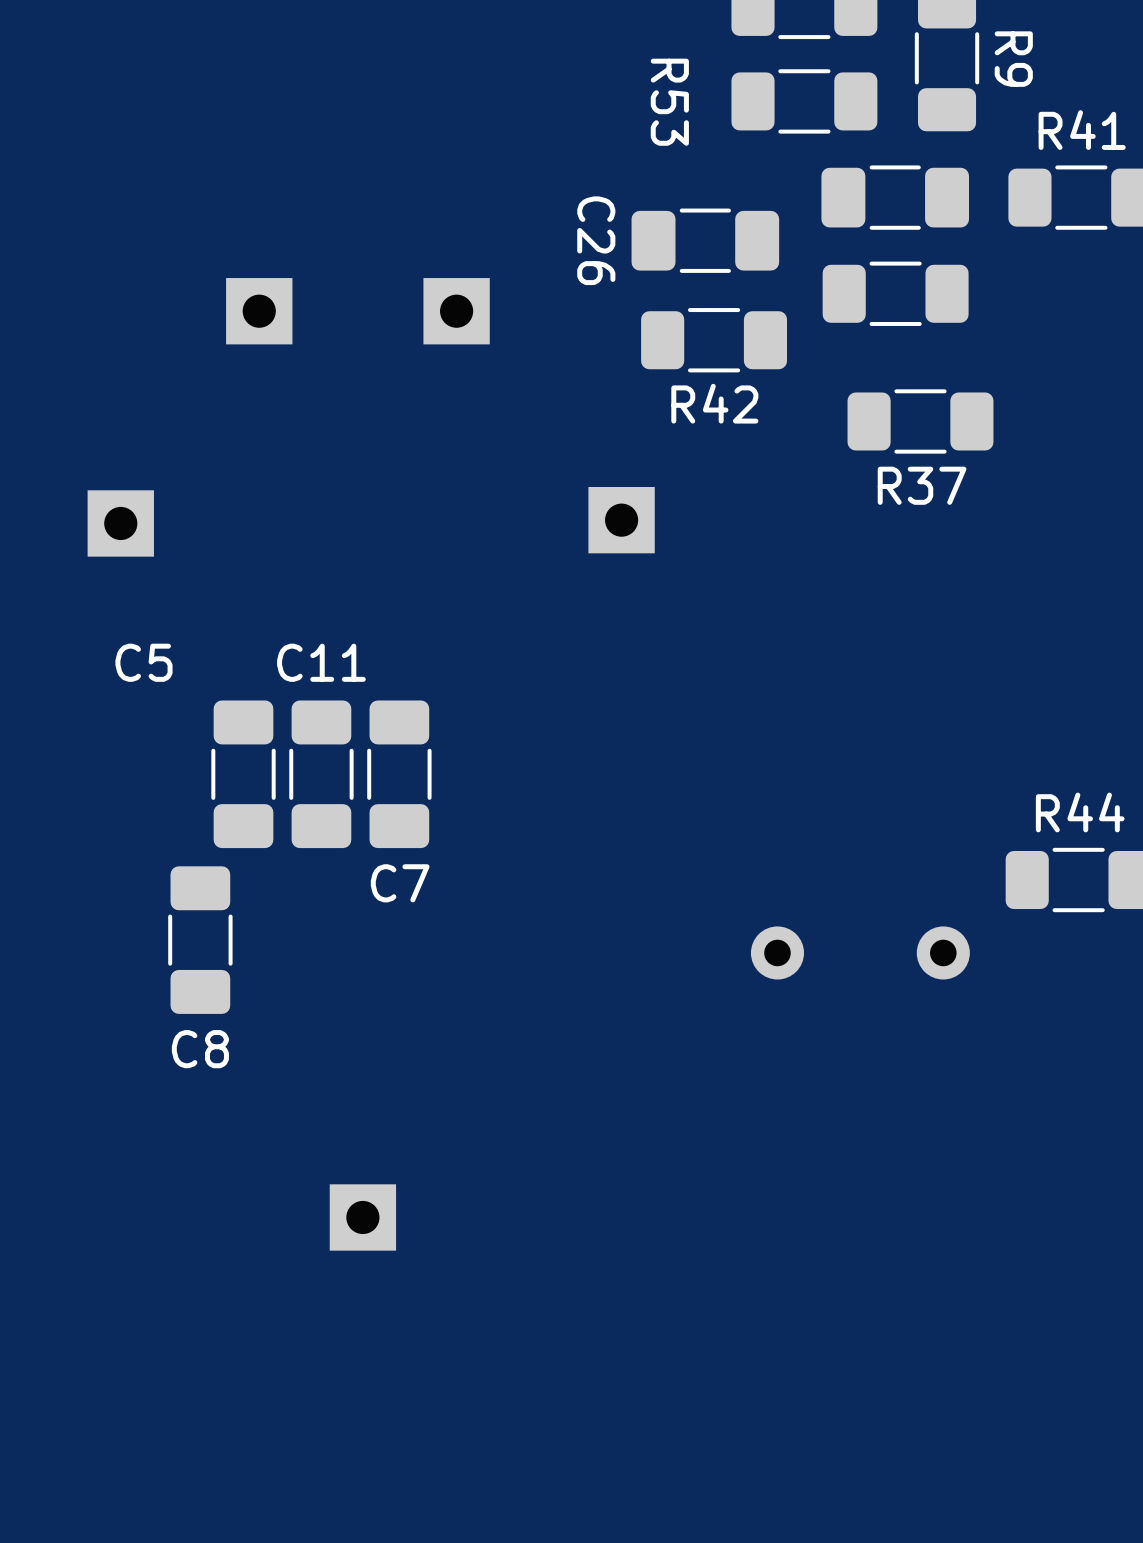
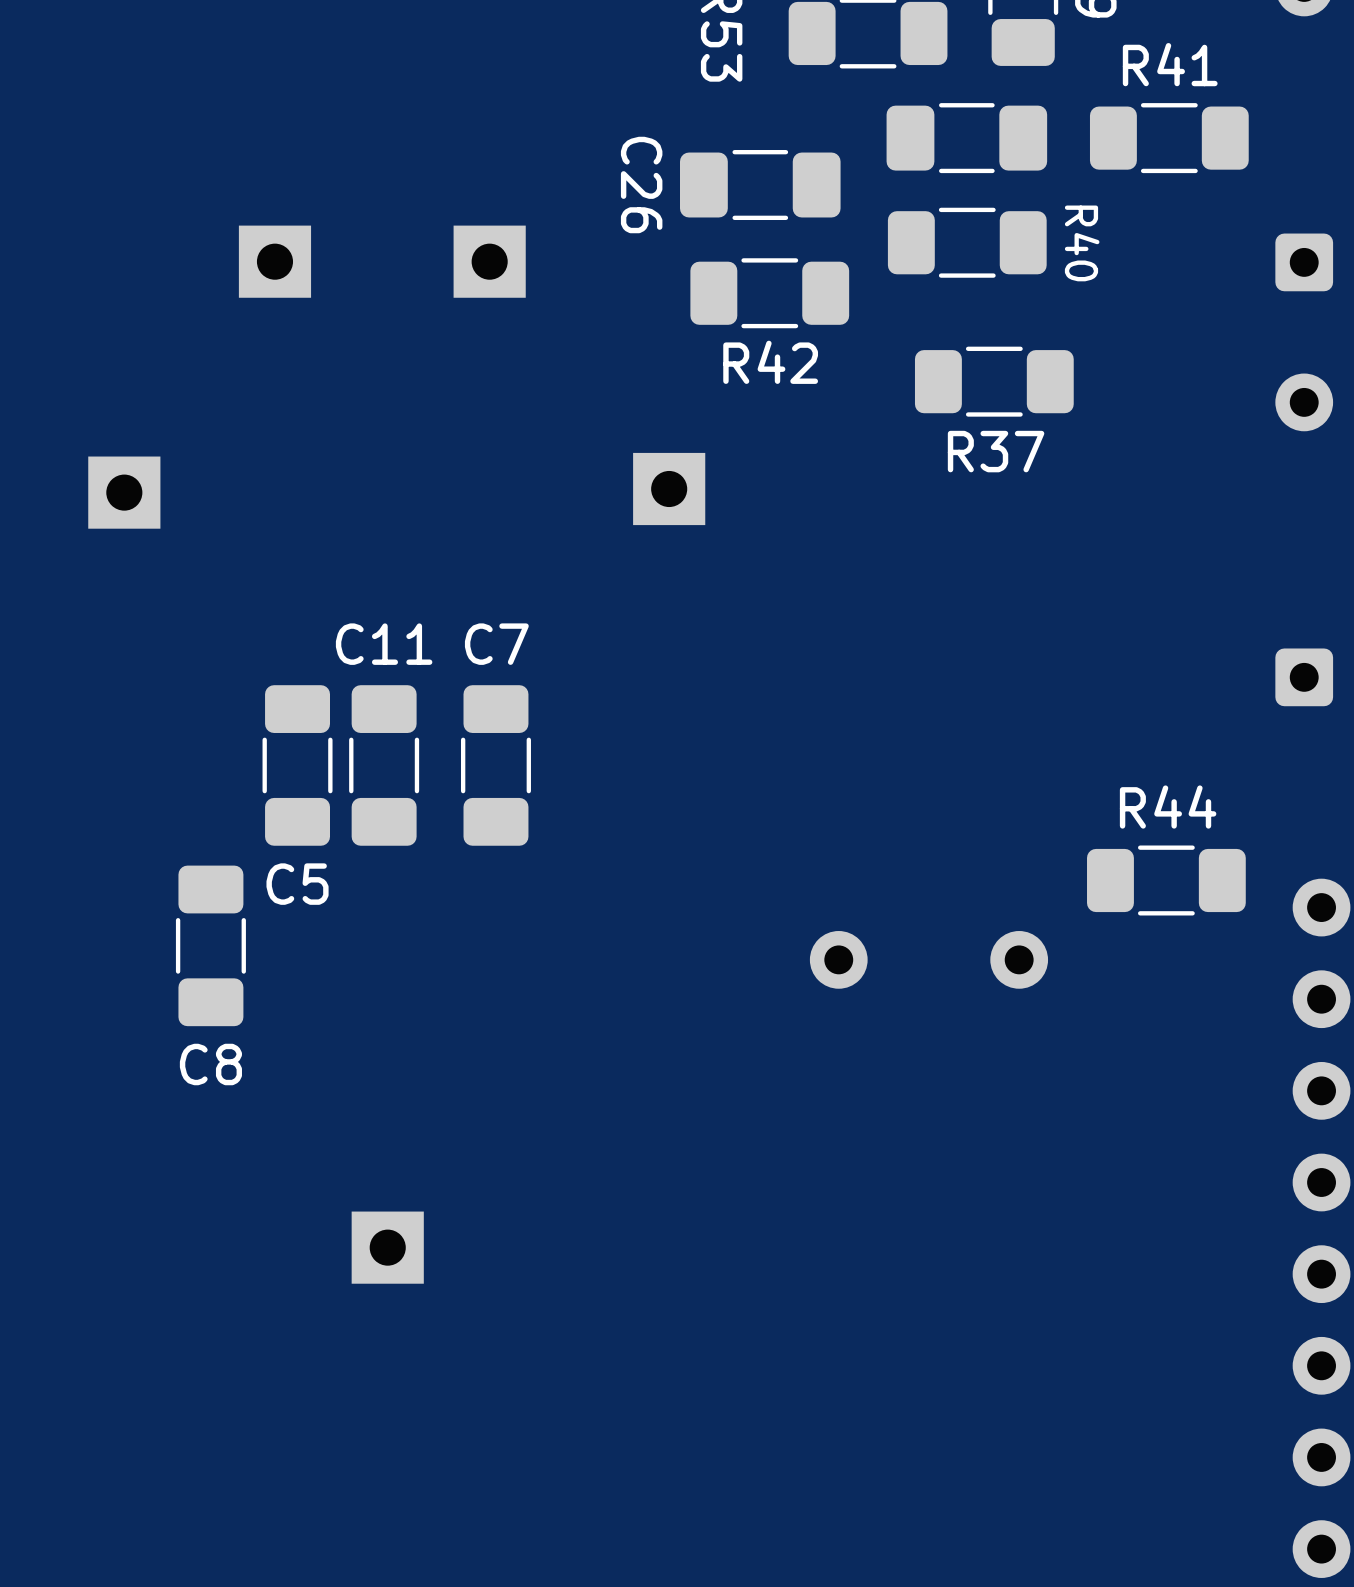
R40 name: none -> R40 (1082, 243)
C5 name position: C5 (144, 662) -> C5 (297, 884)
C5 position: (243, 774) -> (297, 765)
C11 position: (321, 774) -> (384, 765)
C7 position: (399, 774) -> (495, 765)
C7 name position: C7 (400, 883) -> C7 (496, 644)

